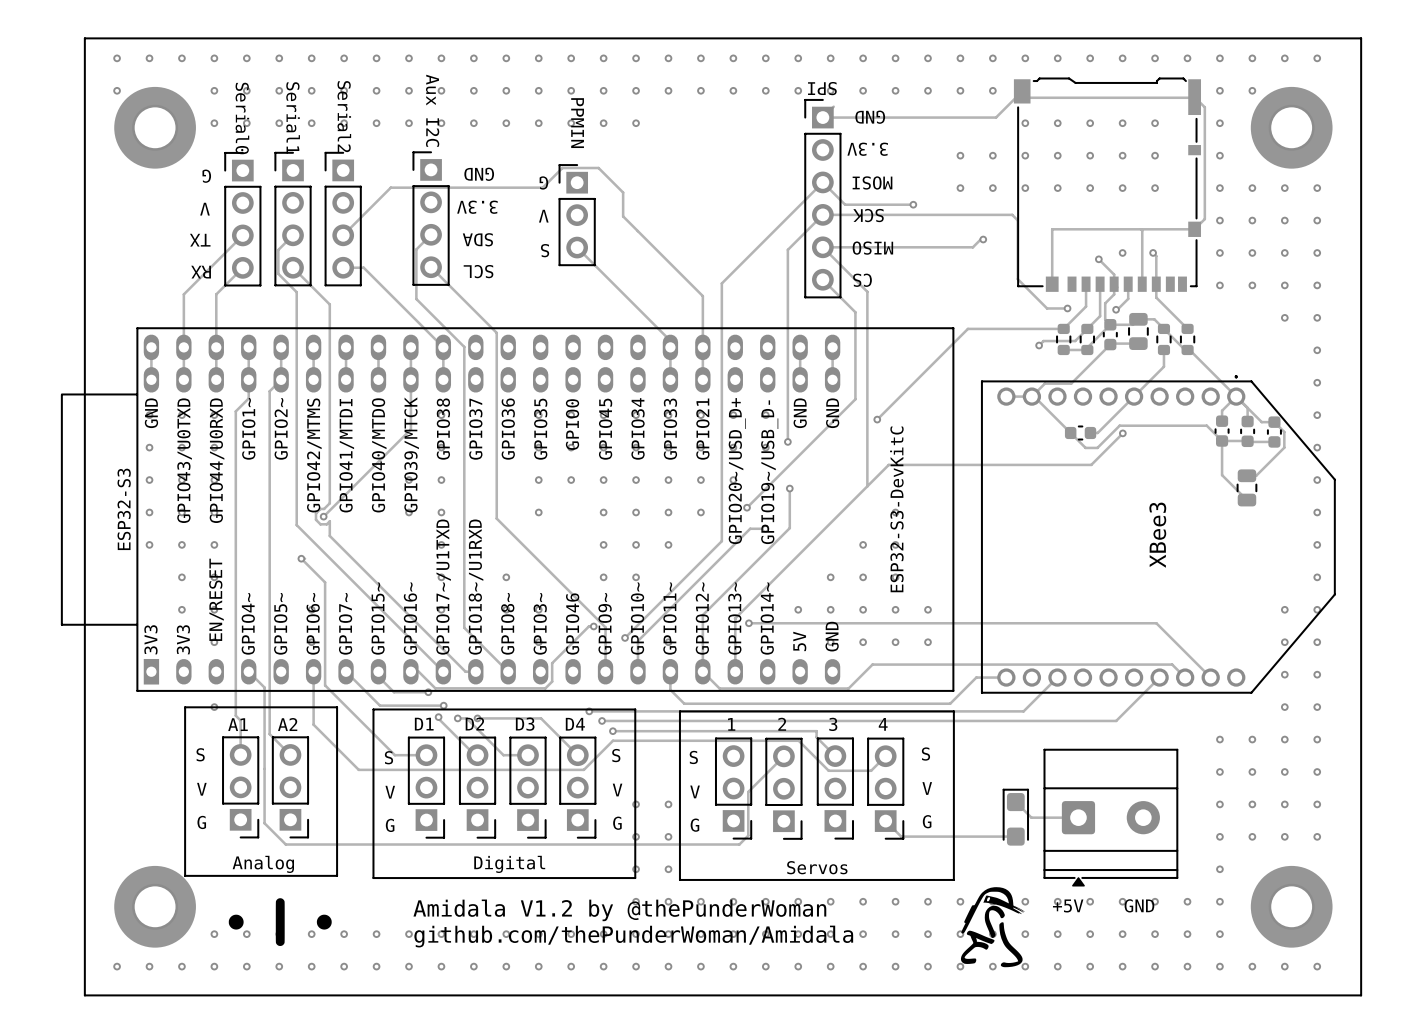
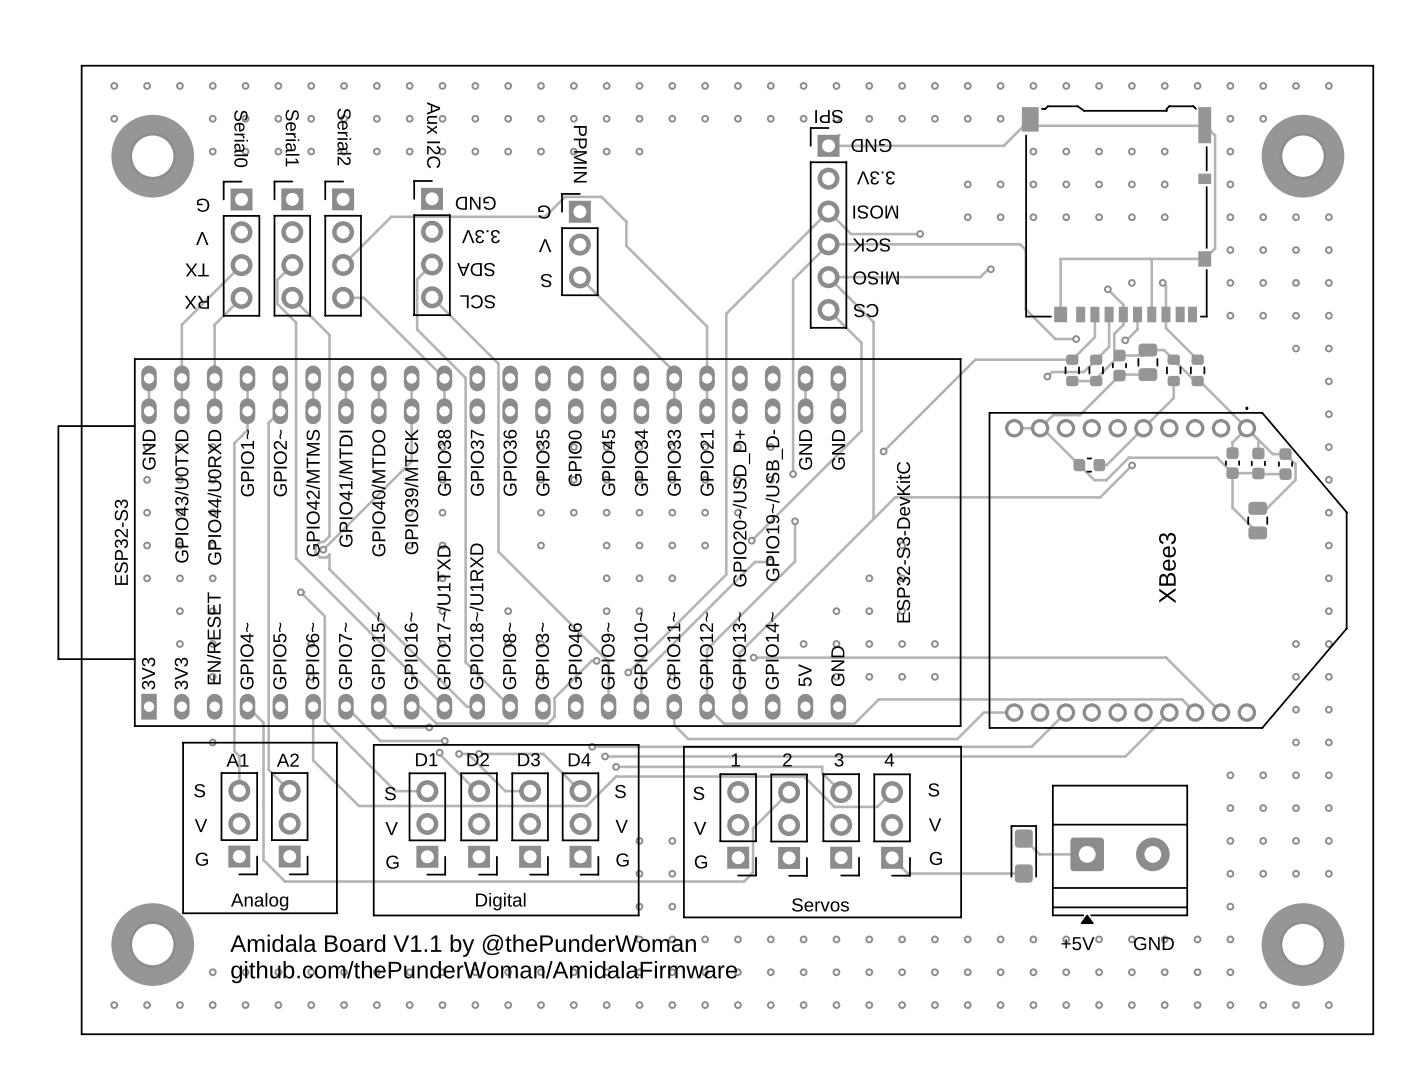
drawing: [960, 887, 1025, 968] -> none
drawing: [228, 898, 332, 947] -> none
text: Amidala V1.2 by @thePunderWoman (619, 910) -> Amidala Board V1.1 by @thePunderWoman (463, 945)
text: github.com/thePunderWoman/Amidala (633, 936) -> github.com/thePunderWoman/AmidalaFirmware (484, 972)

